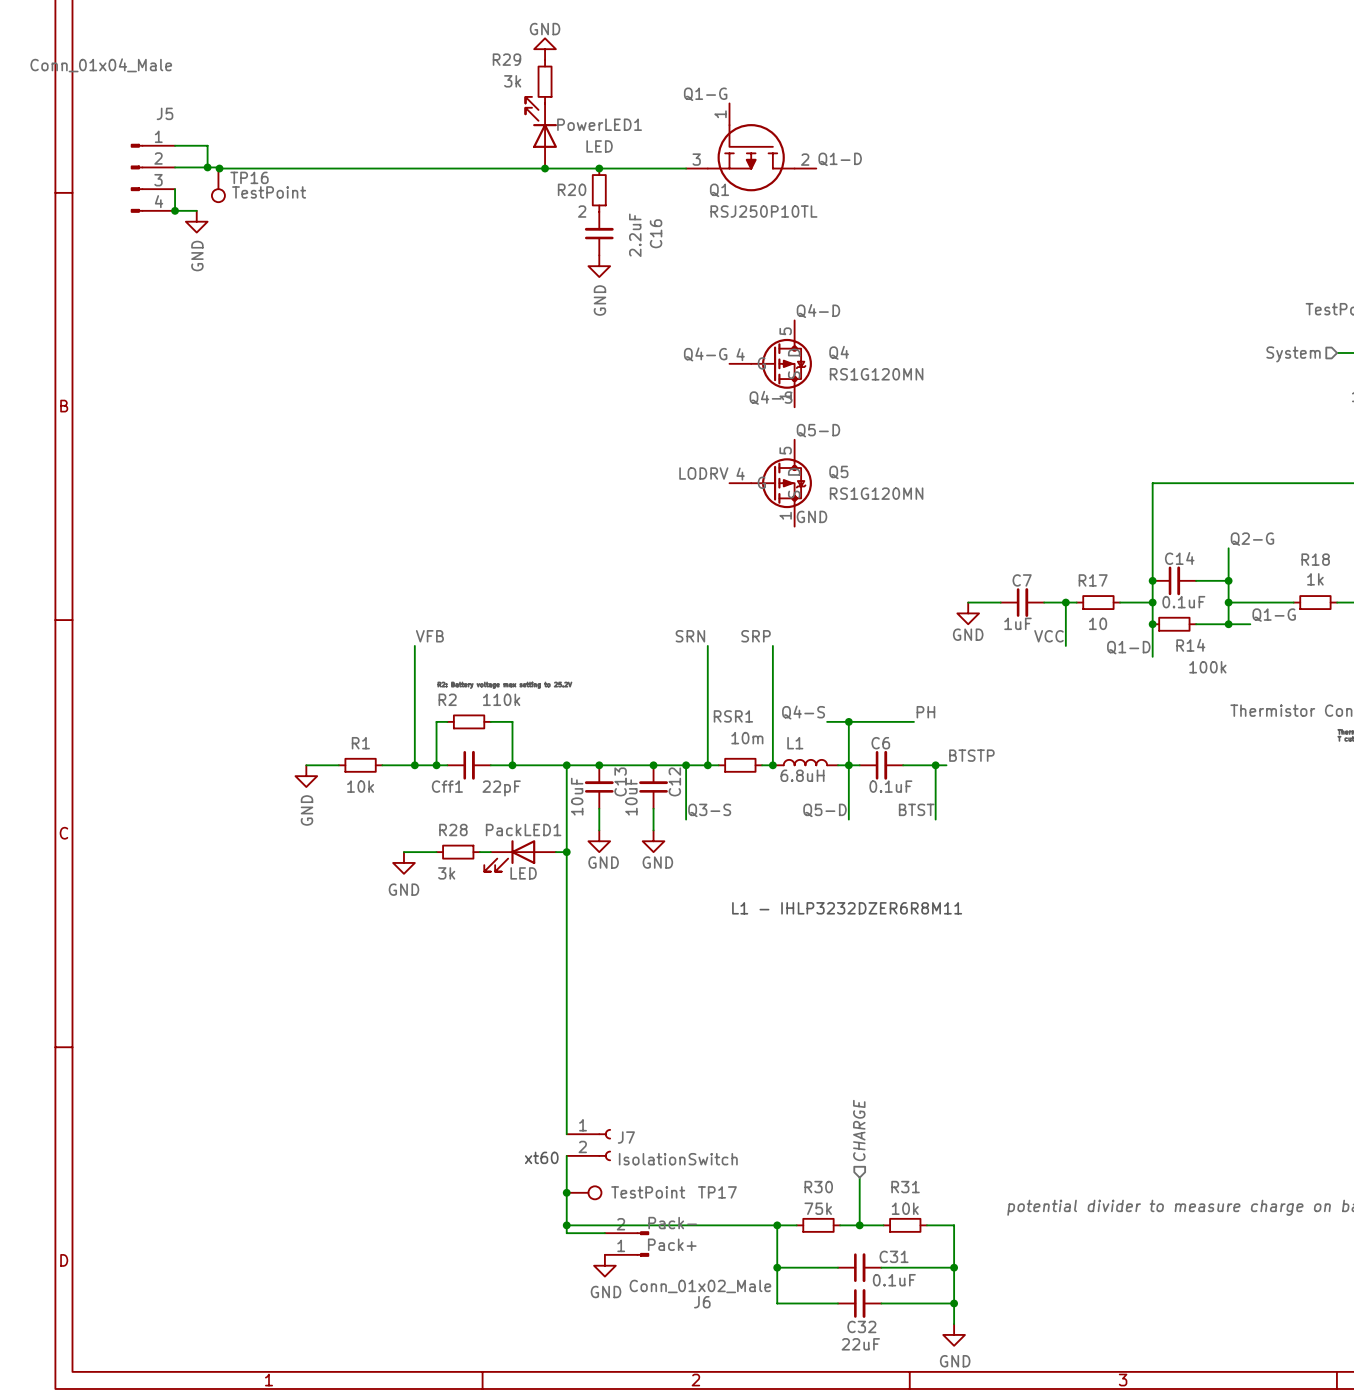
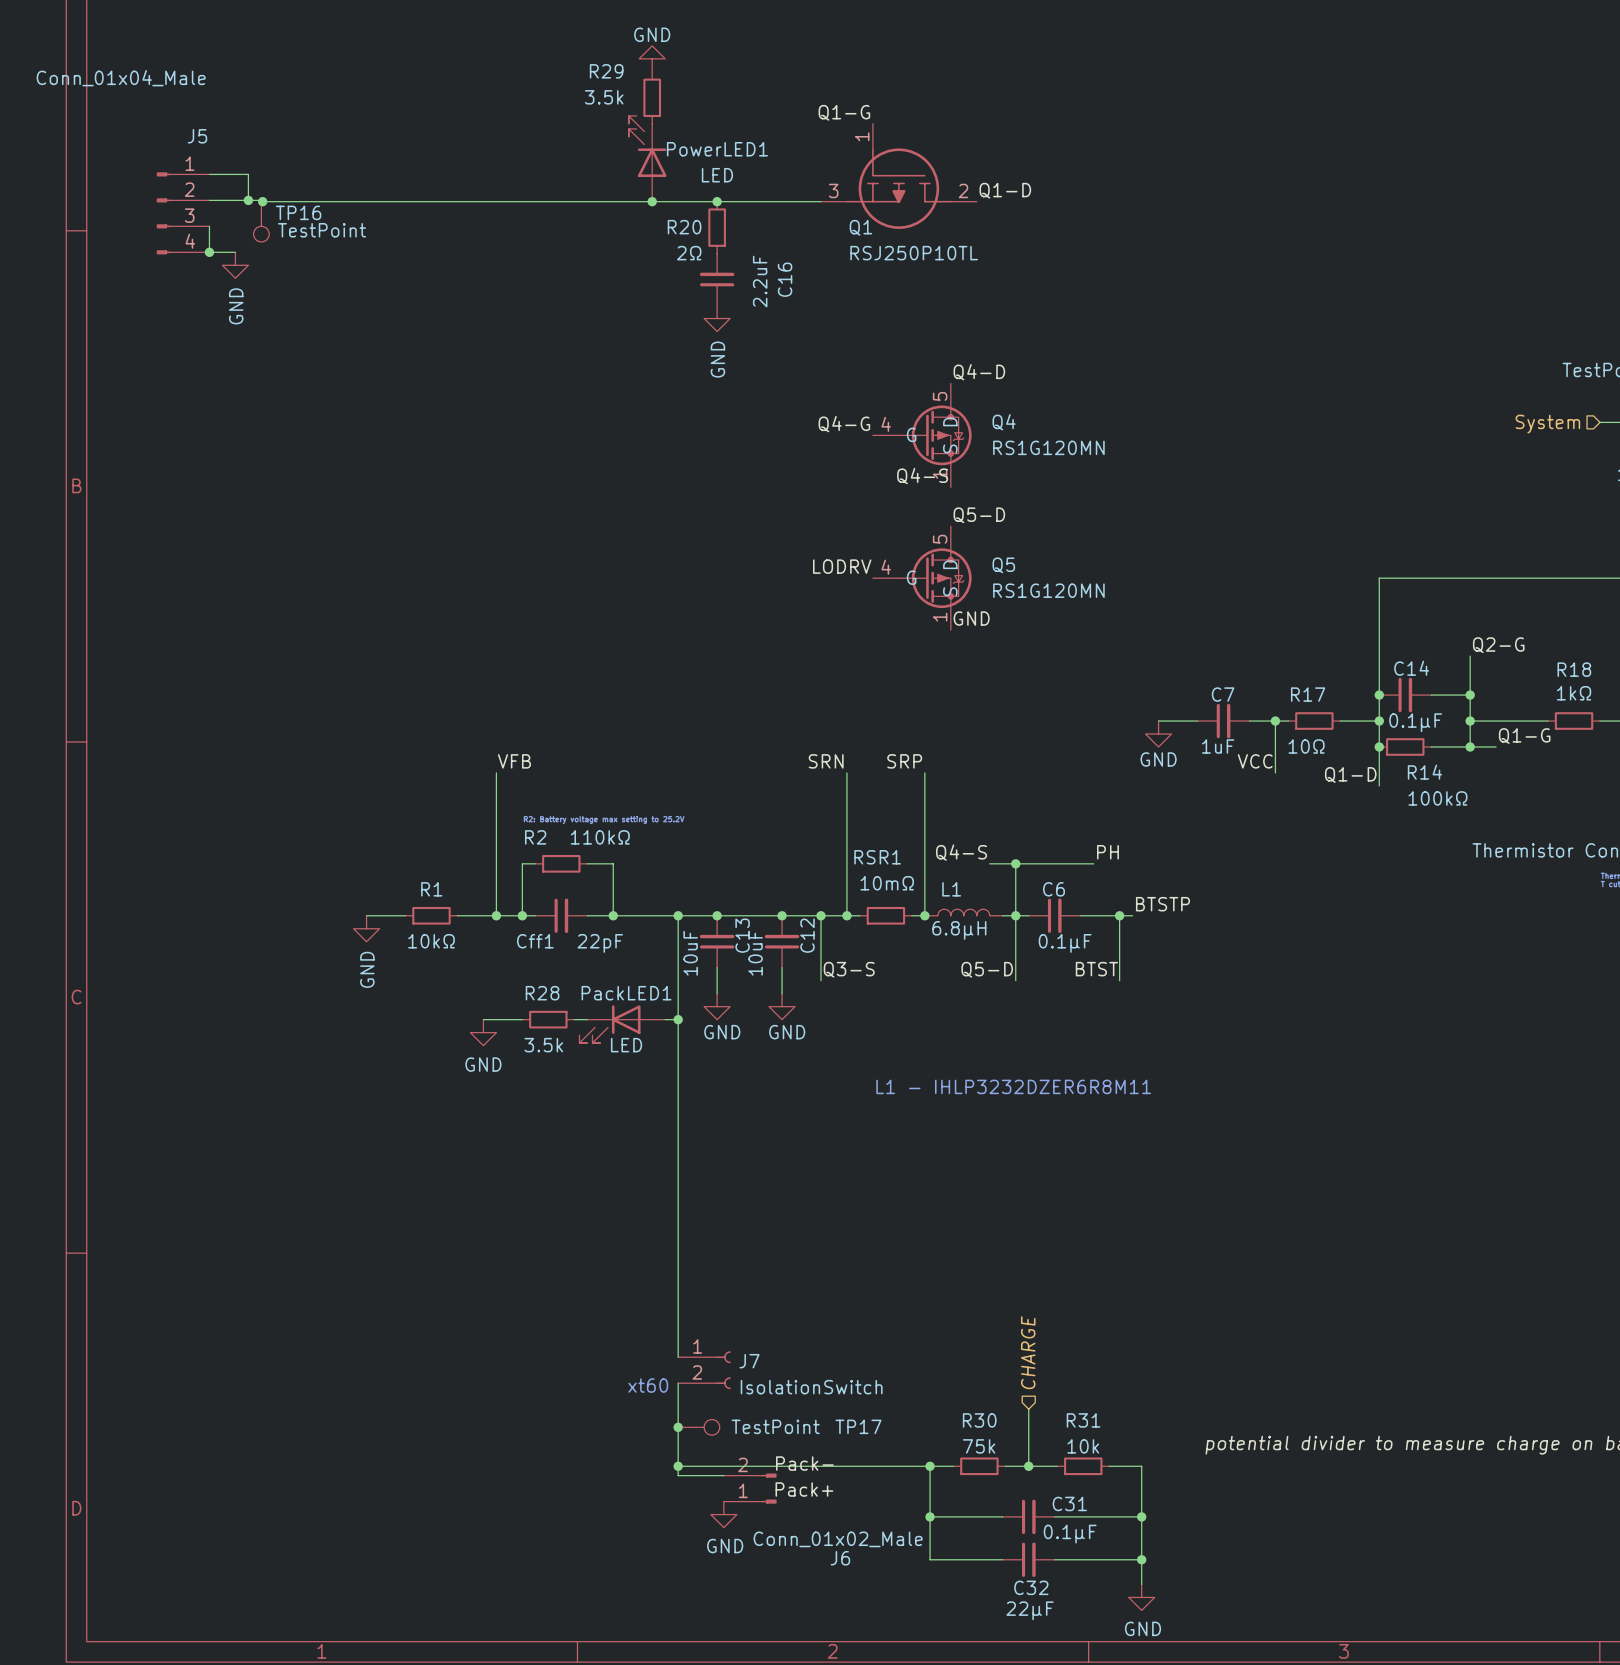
R29 value: 3k (512, 81) -> 3.5k (604, 97)
R20 value: 2 (582, 211) -> 2Ω (689, 253)
R18 value: 1k (1315, 579) -> 1kΩ (1574, 693)
C14 value: 0.1uF (1183, 602) -> 0.1µF (1415, 722)
R17 value: 10 (1098, 623) -> 10Ω (1306, 746)
R14 value: 100k (1207, 667) -> 100kΩ (1437, 798)
R2 value: 110k (501, 699) -> 110kΩ (600, 837)
RSR1 value: 10m (747, 738) -> 10mΩ (887, 883)
L1 value: 6.8uH (802, 775) -> 6.8µH (959, 930)
R1 value: 10k (360, 786) -> 10kΩ (431, 941)
C6 value: 0.1uF (890, 786) -> 0.1µF (1065, 943)
R28 value: 3k (446, 873) -> 3.5k (543, 1045)
C31 value: 0.1uF (894, 1280) -> 0.1μF (1070, 1534)
C32 value: 22uF (860, 1344) -> 22μF (1030, 1610)

